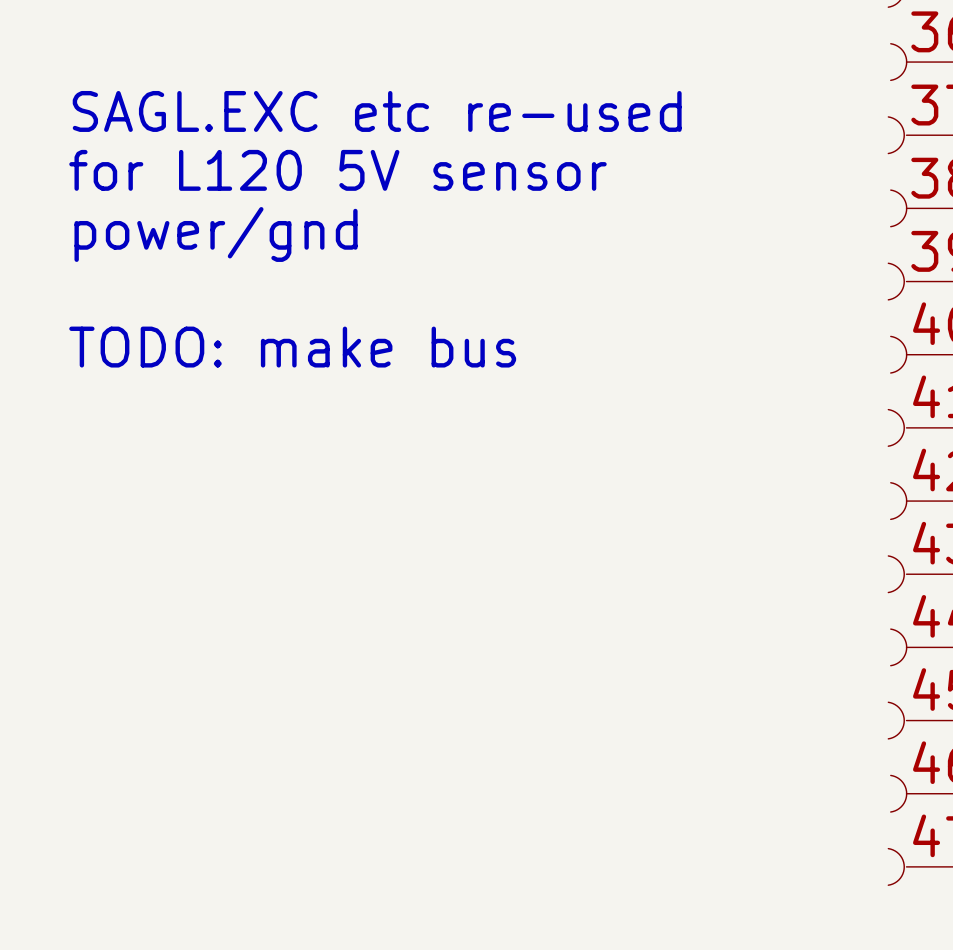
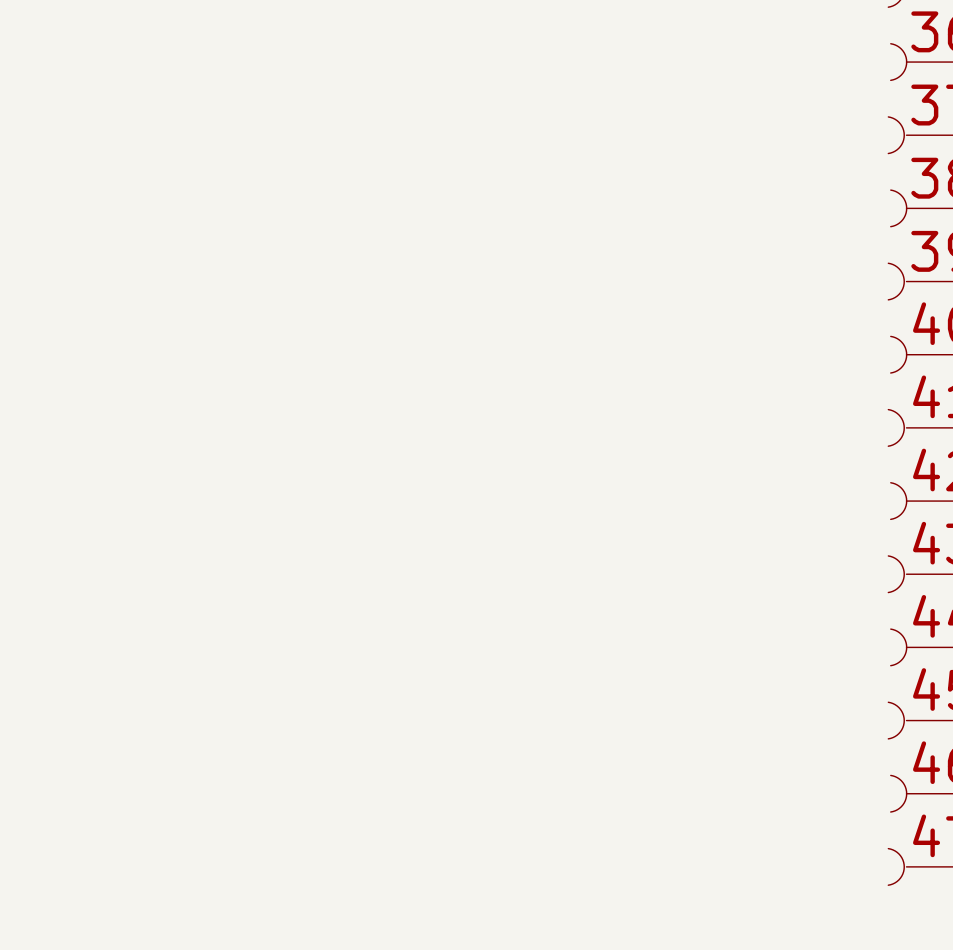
text: SAGL.EXC etc re-used (377, 111) -> none
text: for L120 5V sensor (337, 170) -> none
text: power/gnd (216, 234) -> none
text: TODO: make bus (292, 347) -> none

